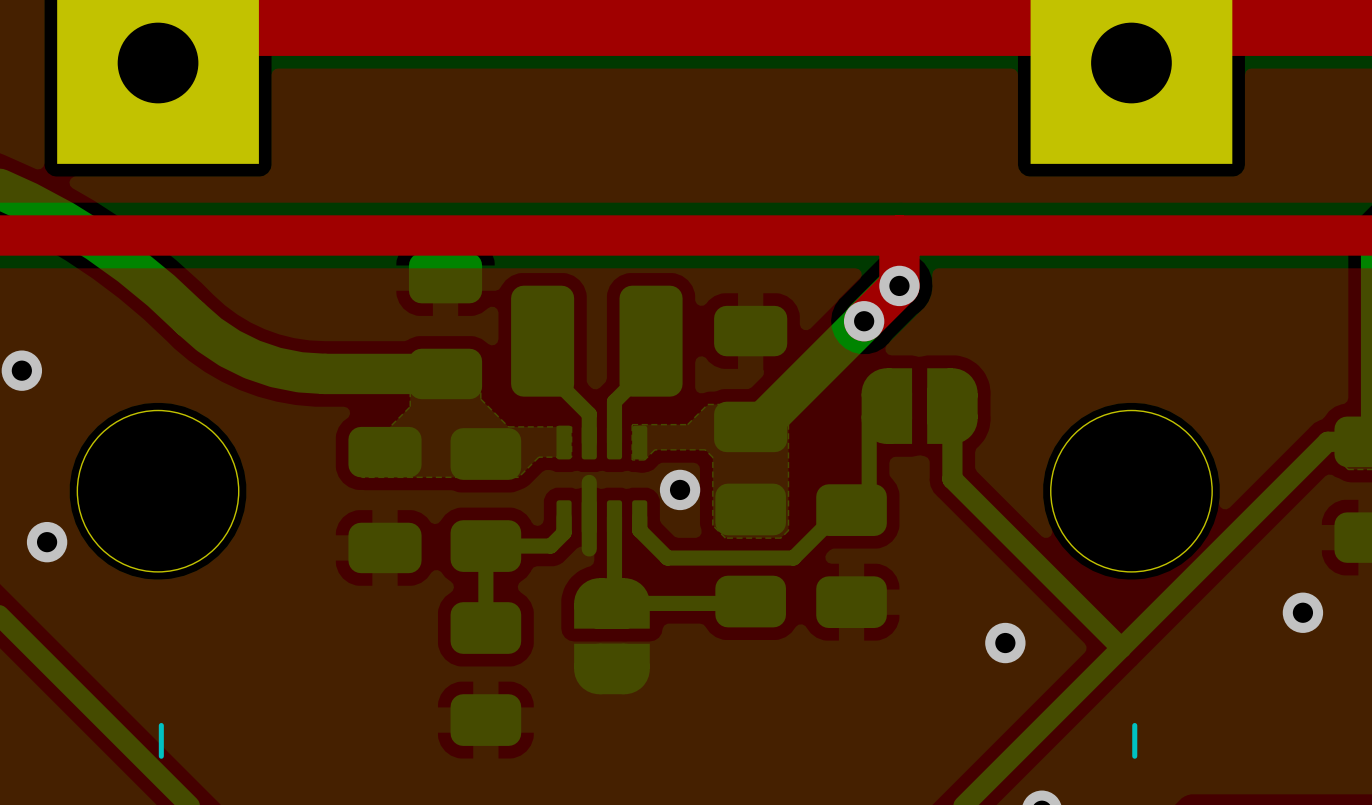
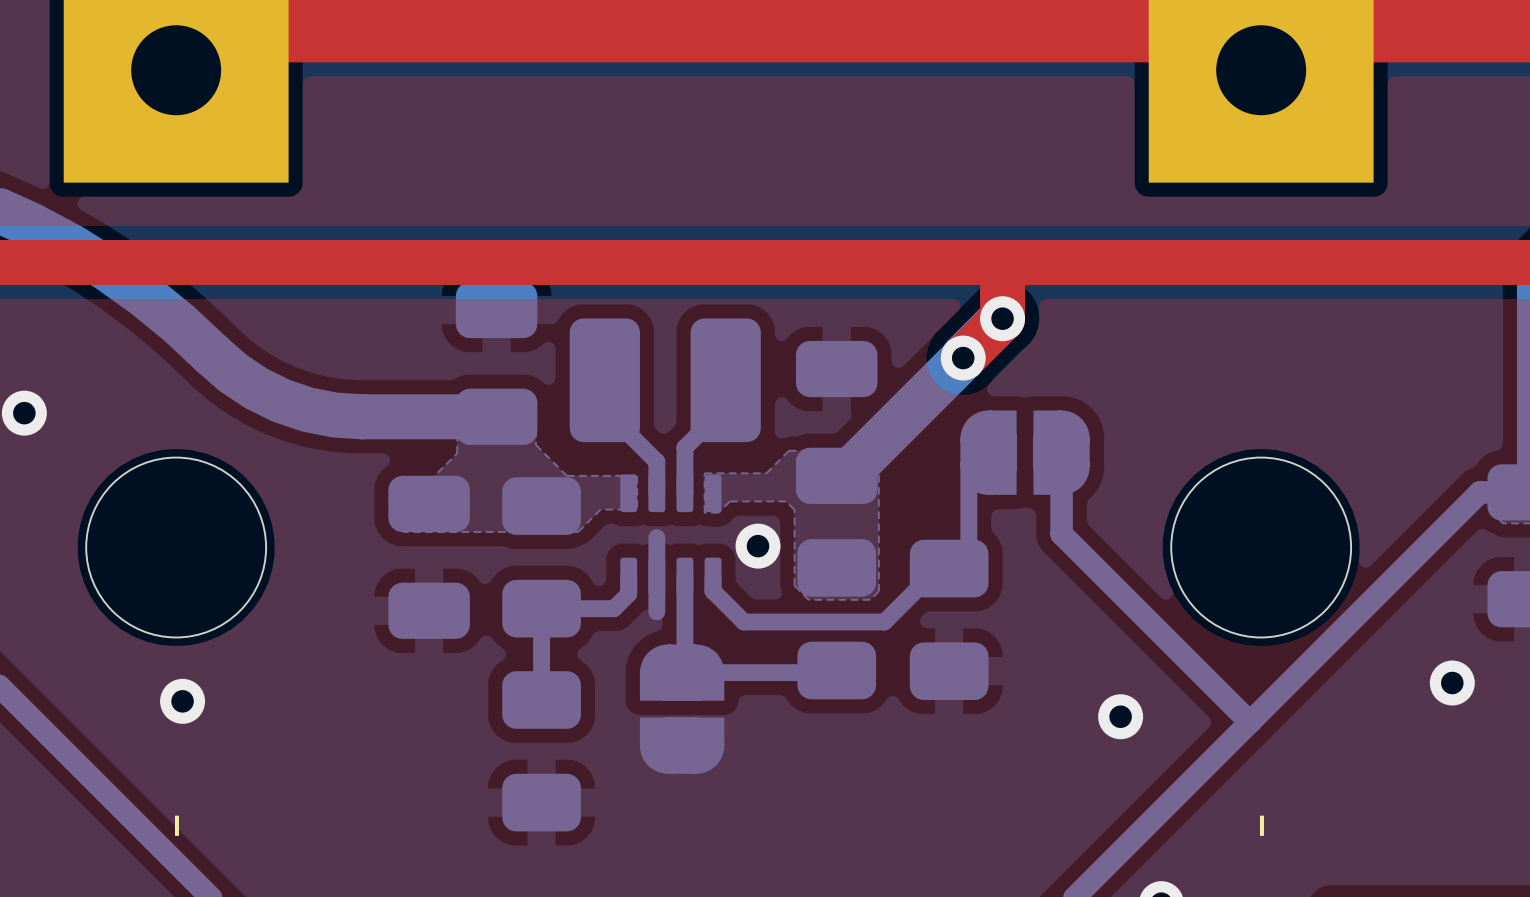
via position: (47, 542) -> (182, 701)

